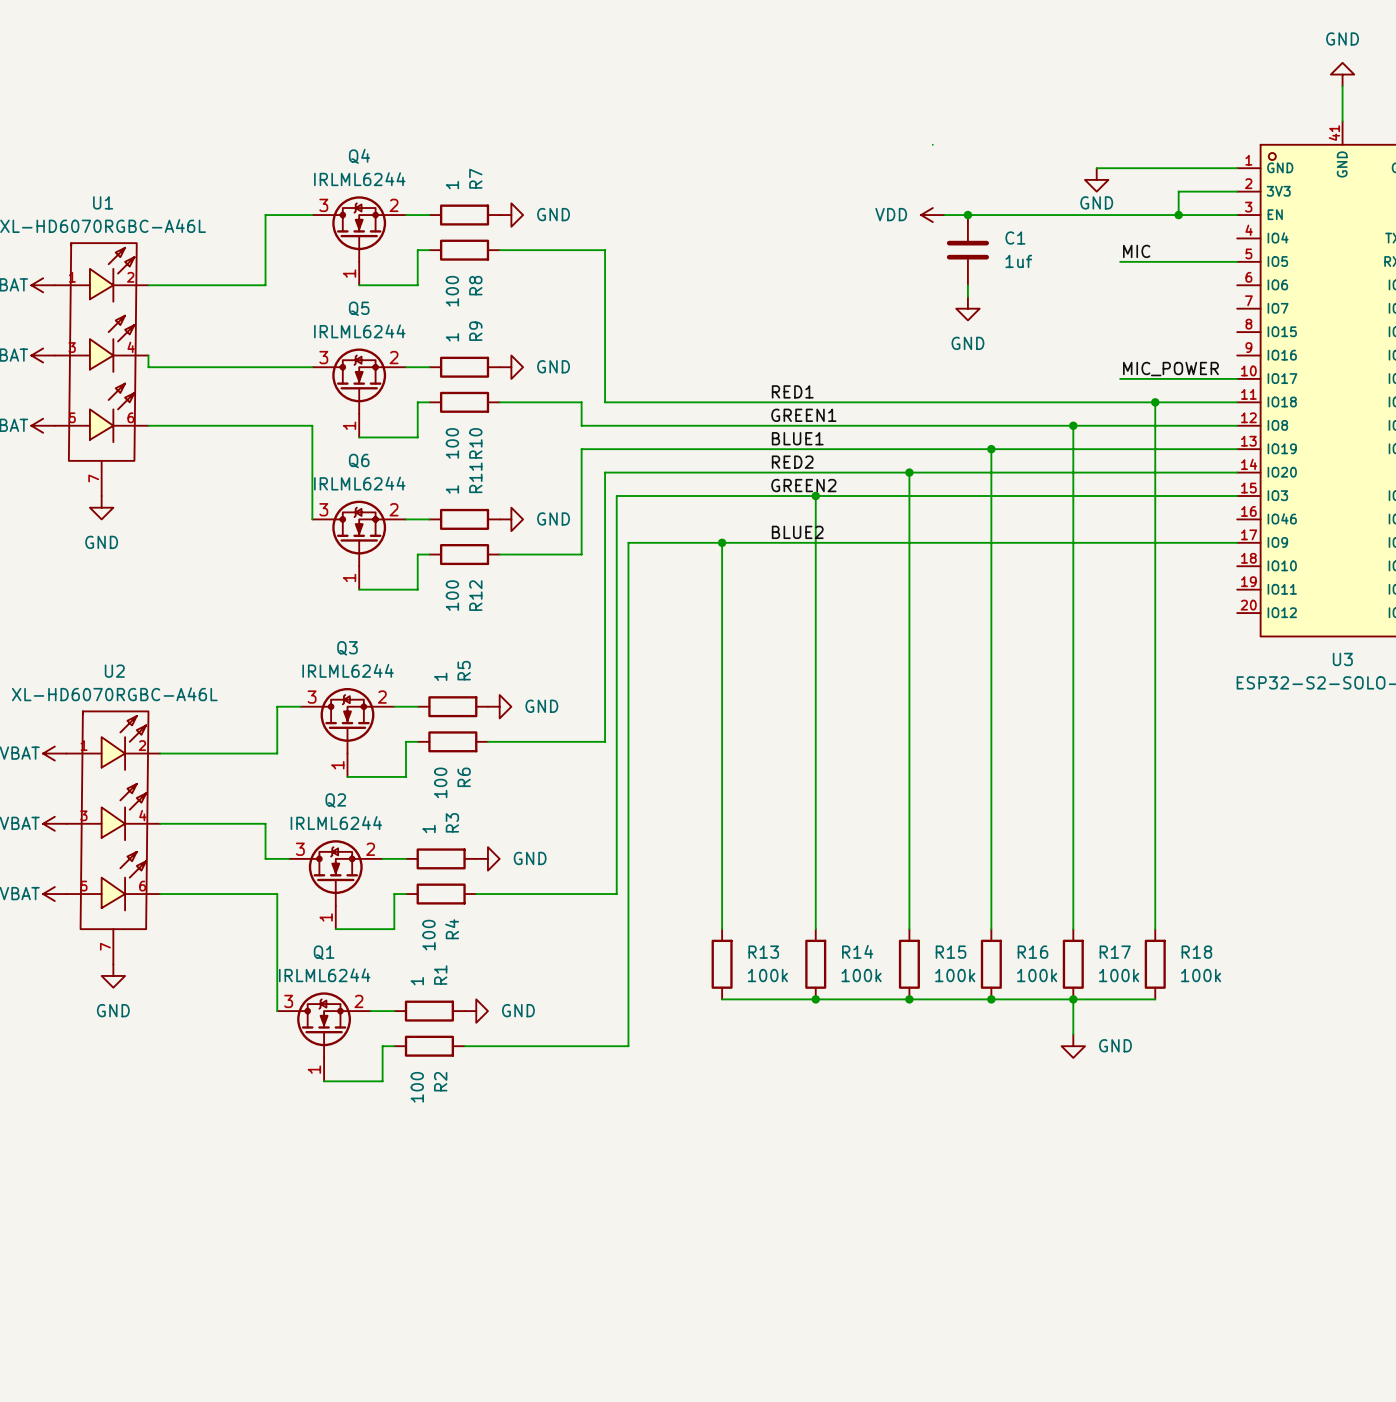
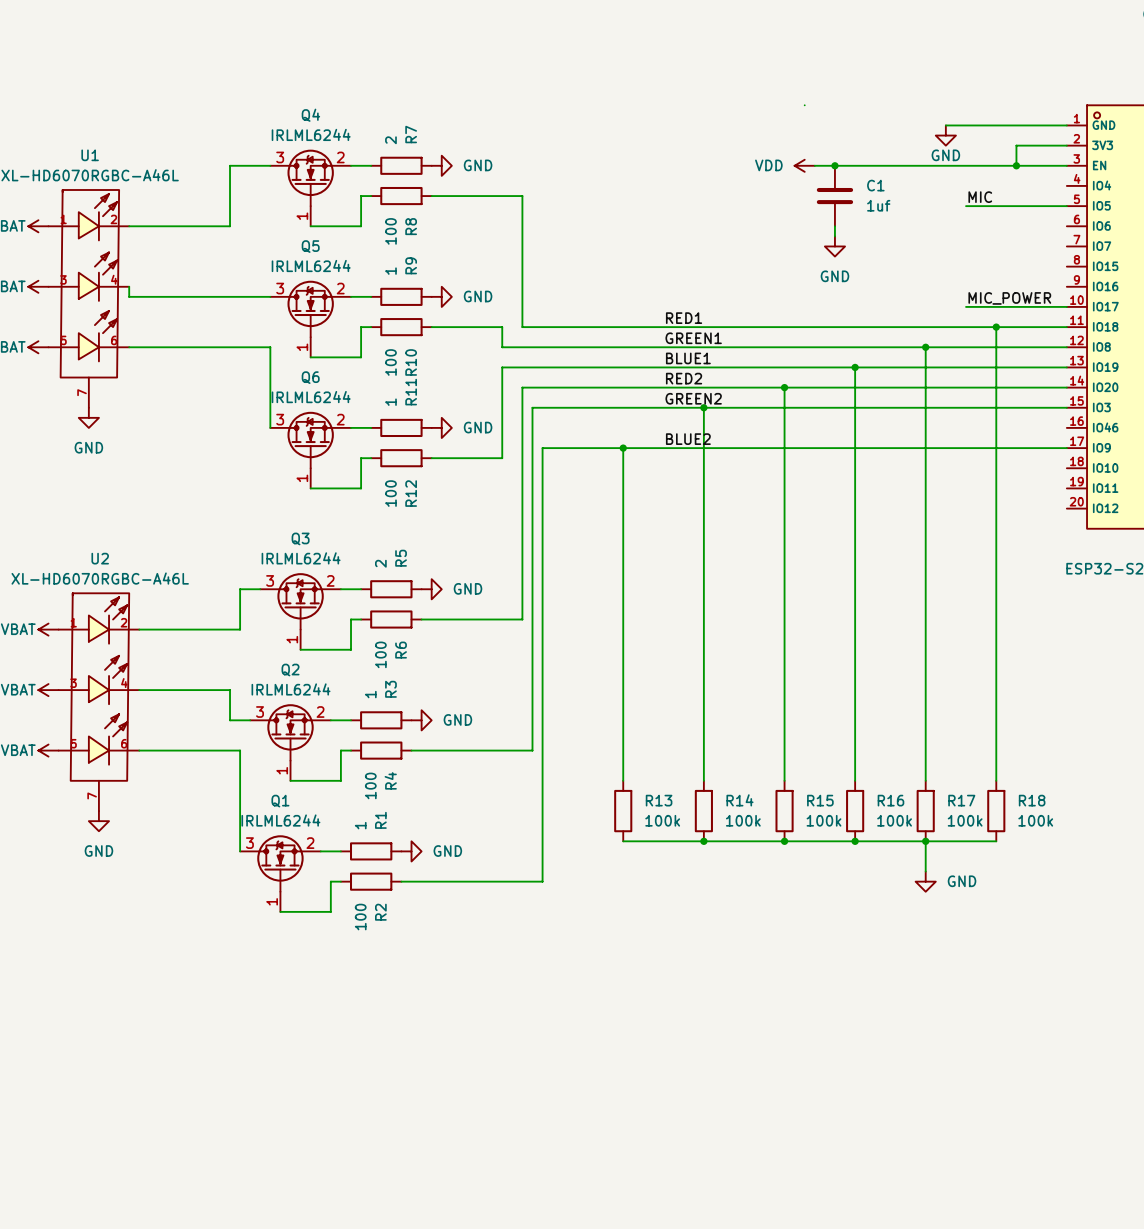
R7 value: 1 (452, 185) -> 2 (390, 140)
R5 value: 1 (440, 676) -> 2 (380, 563)

